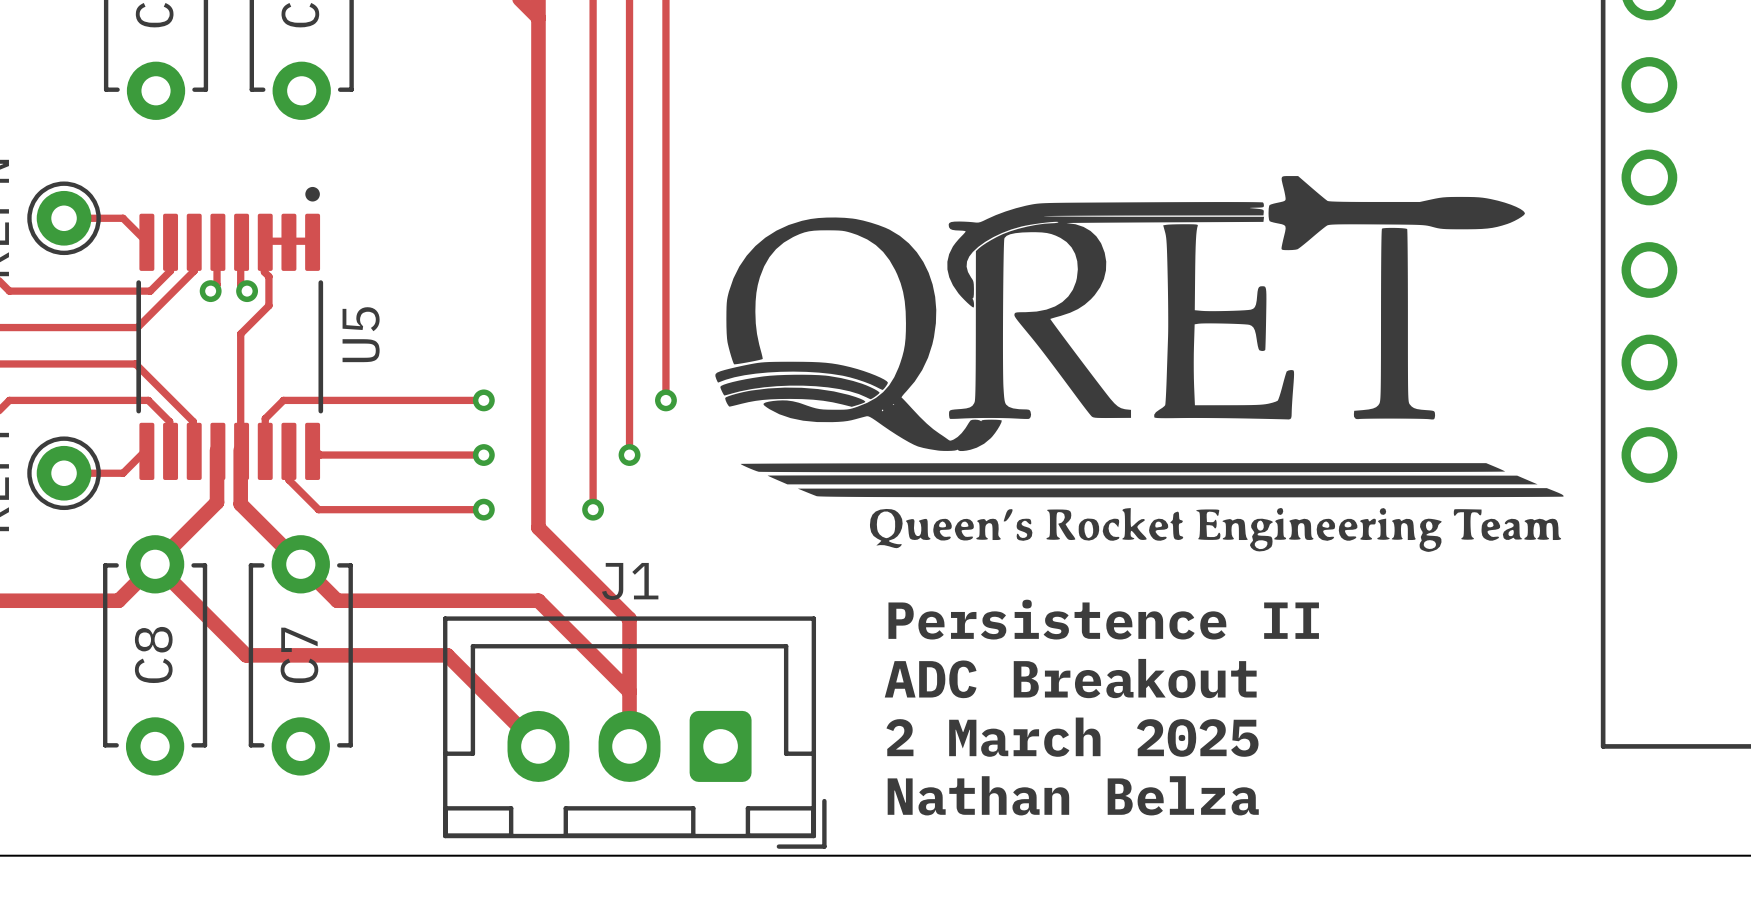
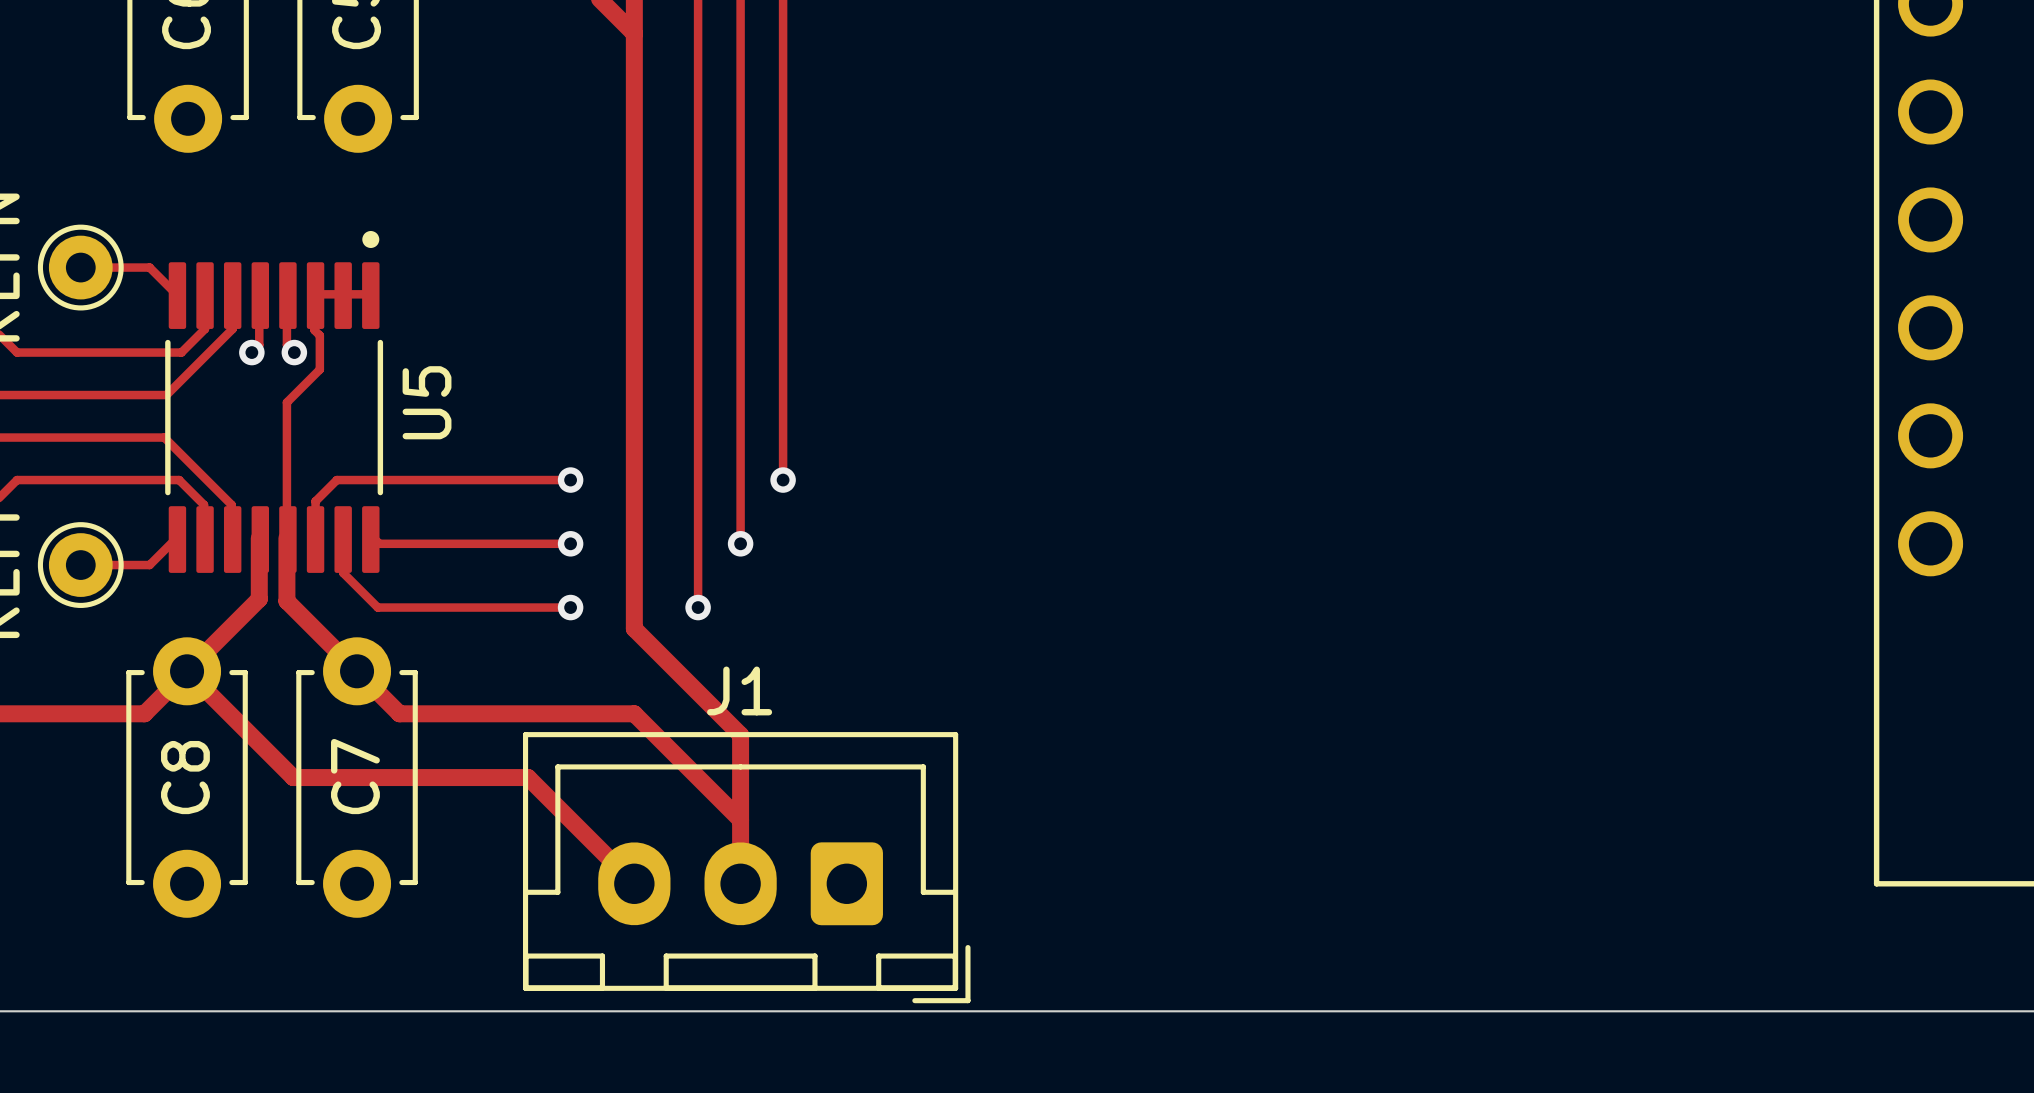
drawing: [715, 176, 1564, 552] -> none
text: Persistence II (1103, 619) -> none
text: ADC Breakout (1070, 678) -> none
text: 2 March 2025 (1072, 737) -> none
text: Nathan Belza (1073, 795) -> none

